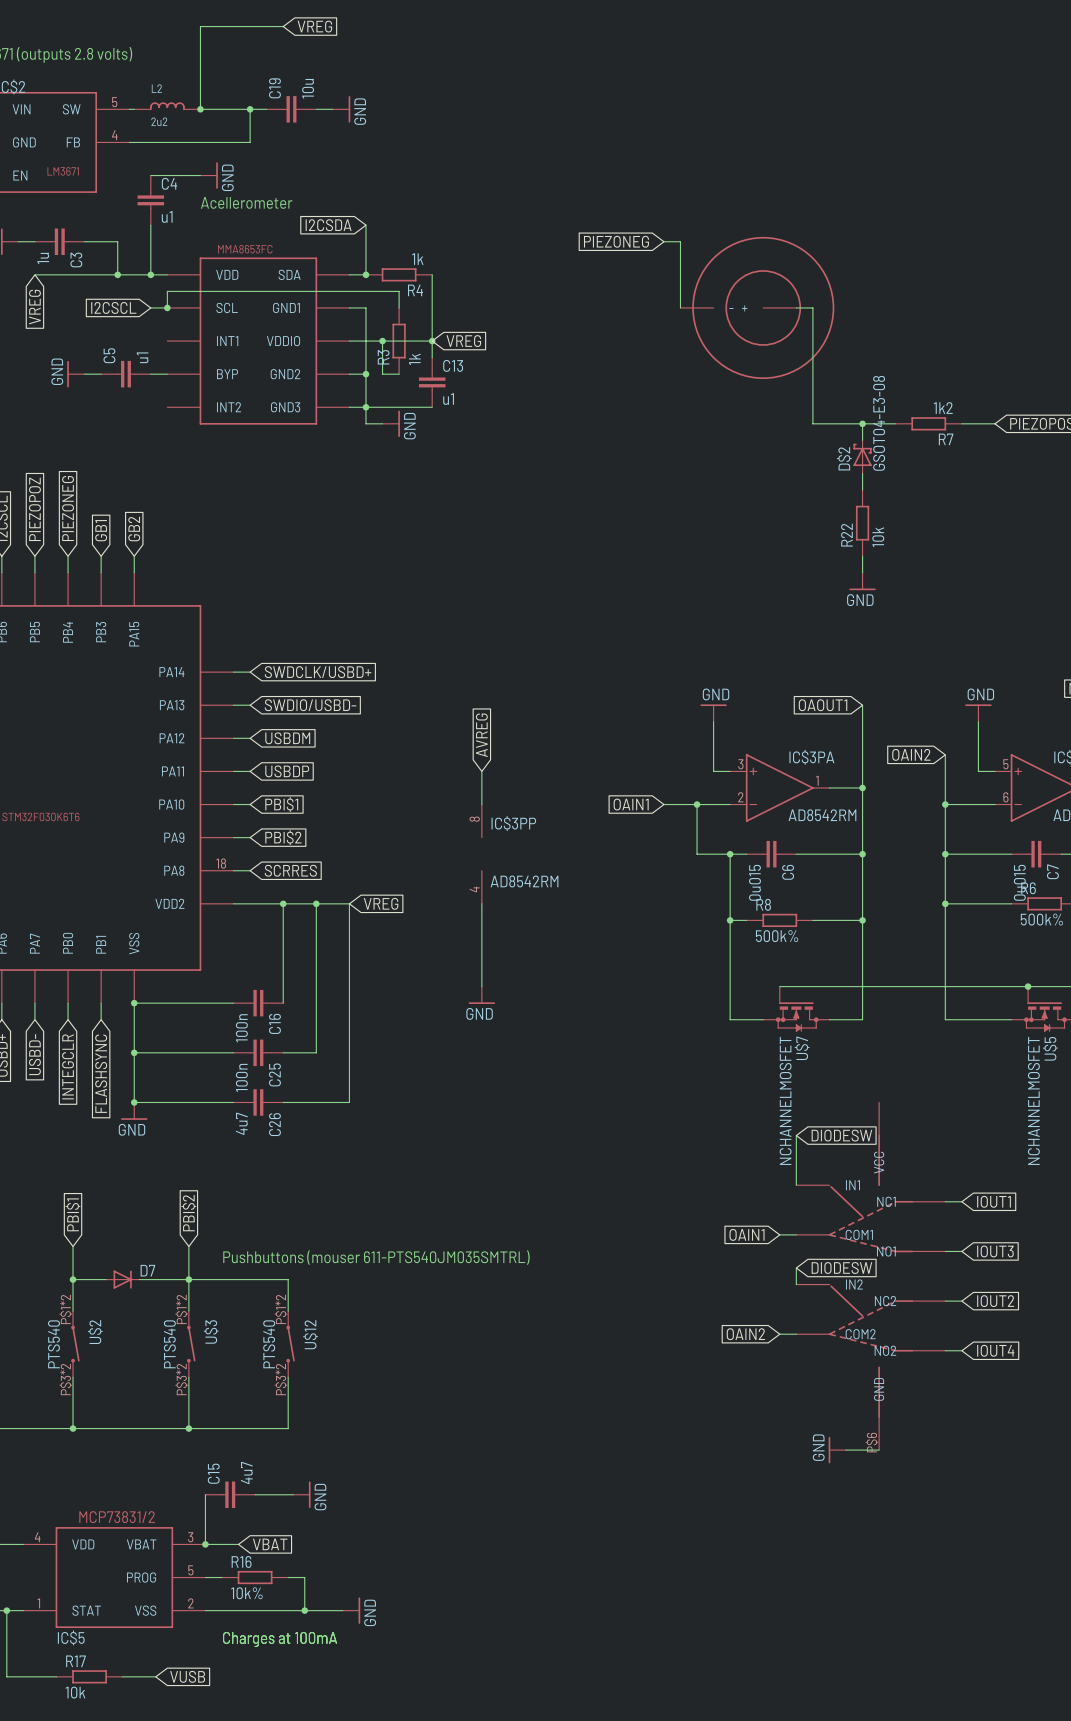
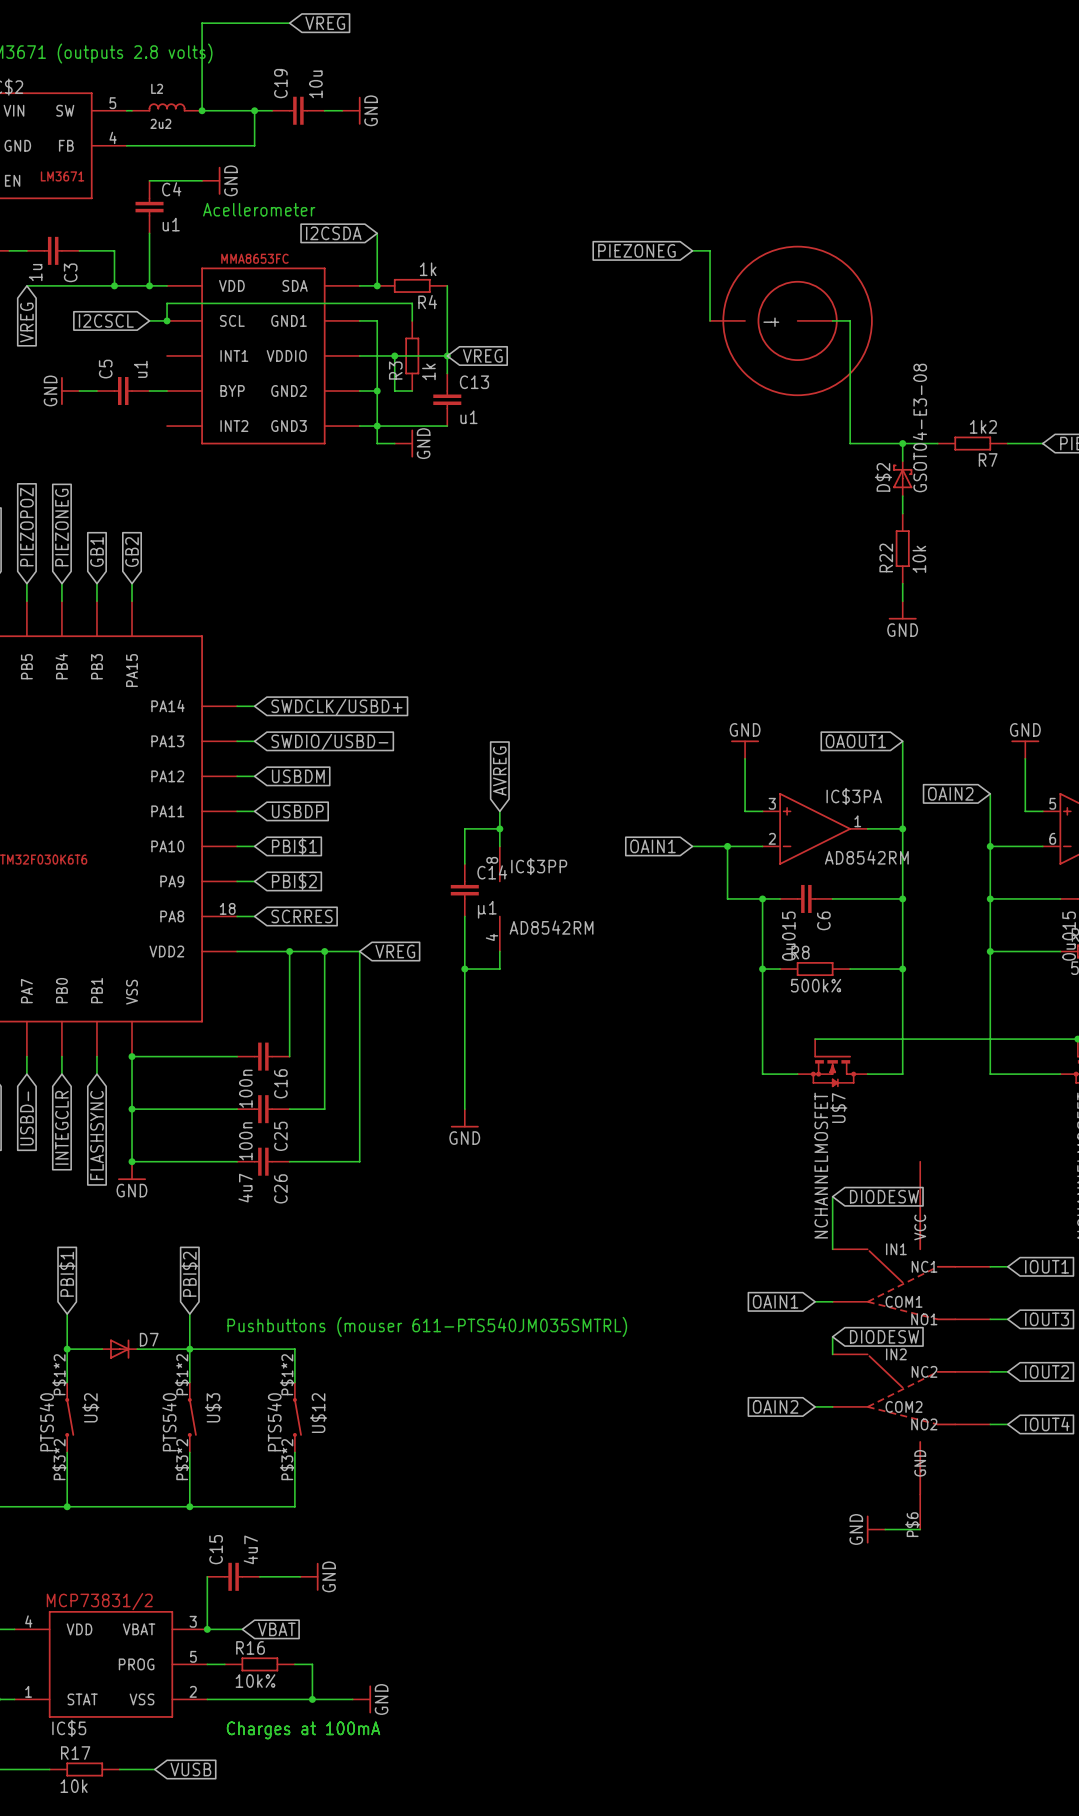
wire: none -> (499, 828) (464, 828) (464, 863)
junction: none -> (499, 828)
C14: none -> µ1 (464, 890)
wire: none -> (464, 916) (464, 1109)
junction: none -> (464, 969)
wire: (481, 920) (481, 986) -> (499, 969) (464, 969)
power symbol position: GND (481, 995) -> GND (464, 1118)

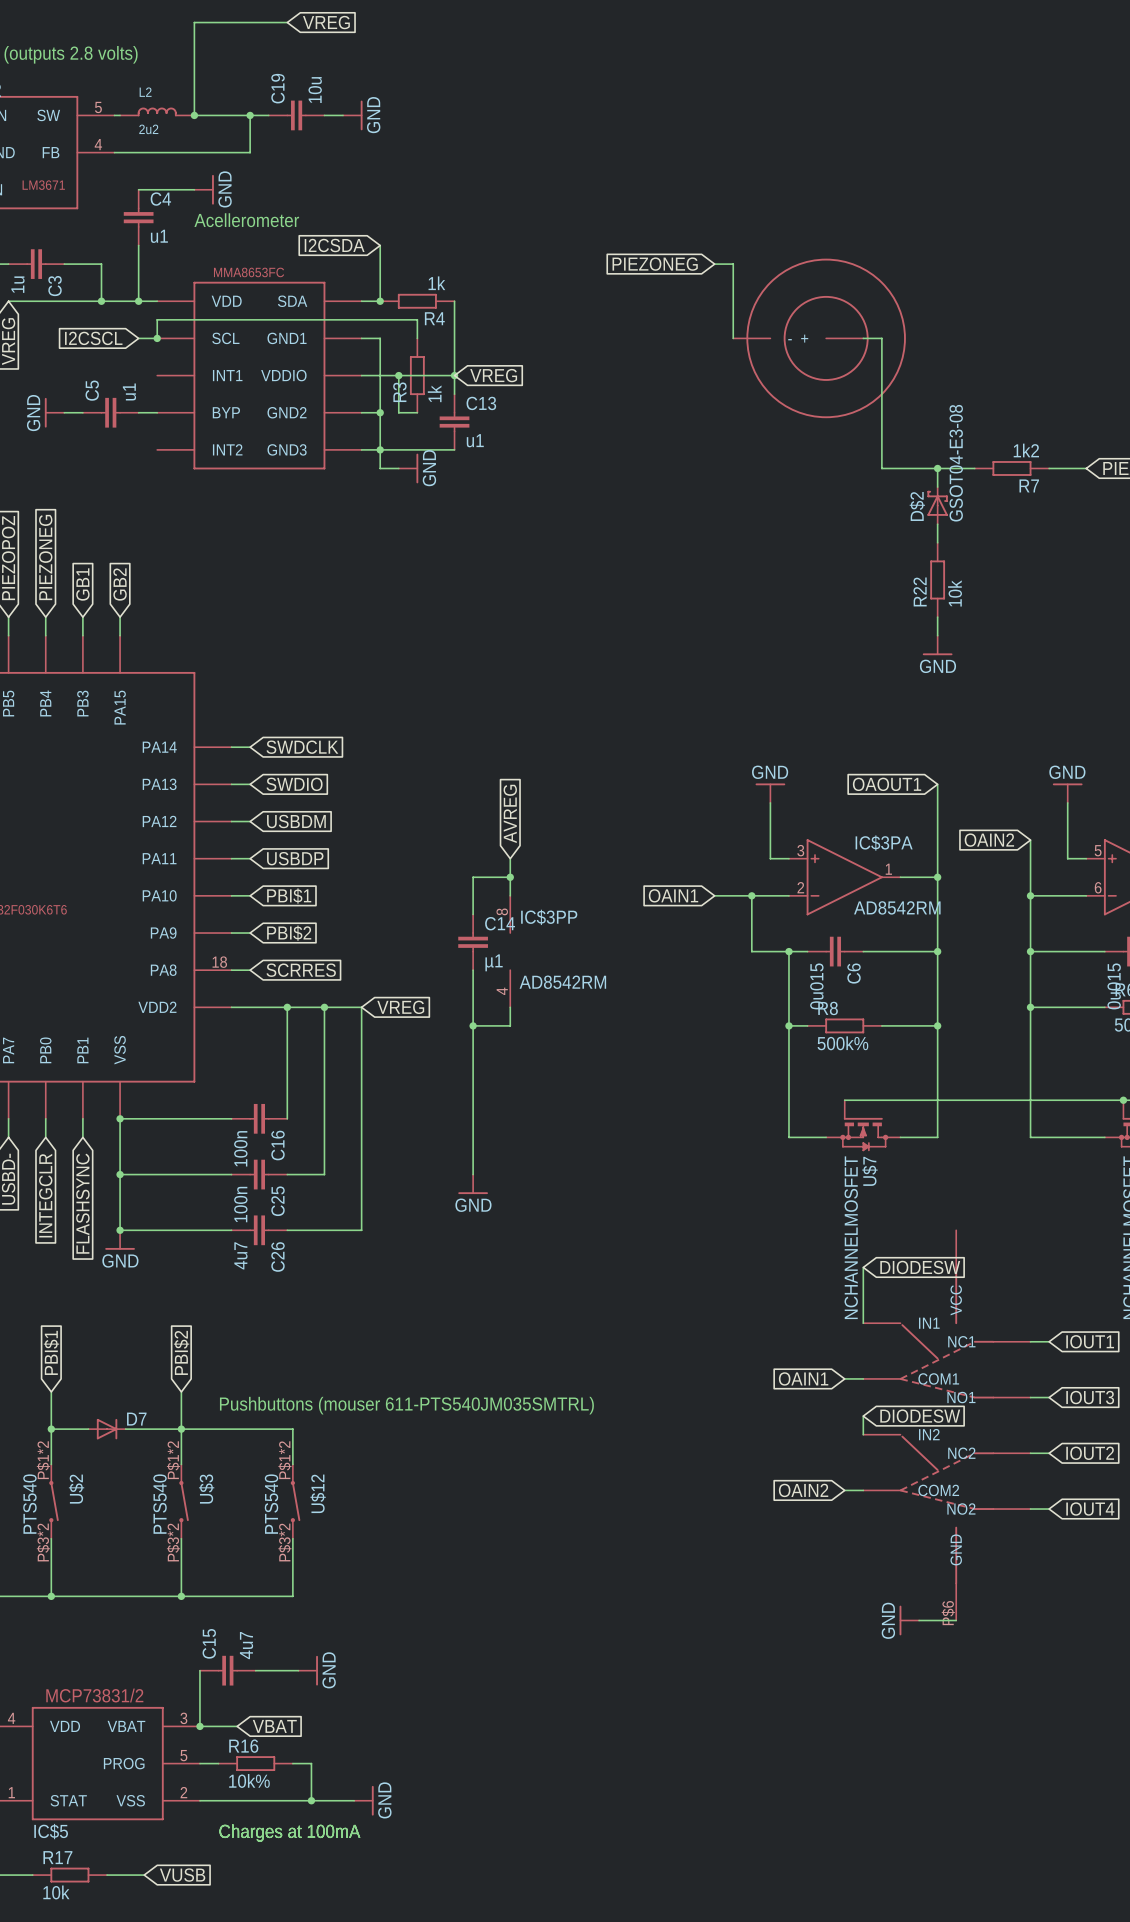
global label: SWDCLK/USBD+ (336, 707) -> SWDCLK (302, 747)
global label: SWDIO/USBD- (329, 742) -> SWDIO (294, 784)

